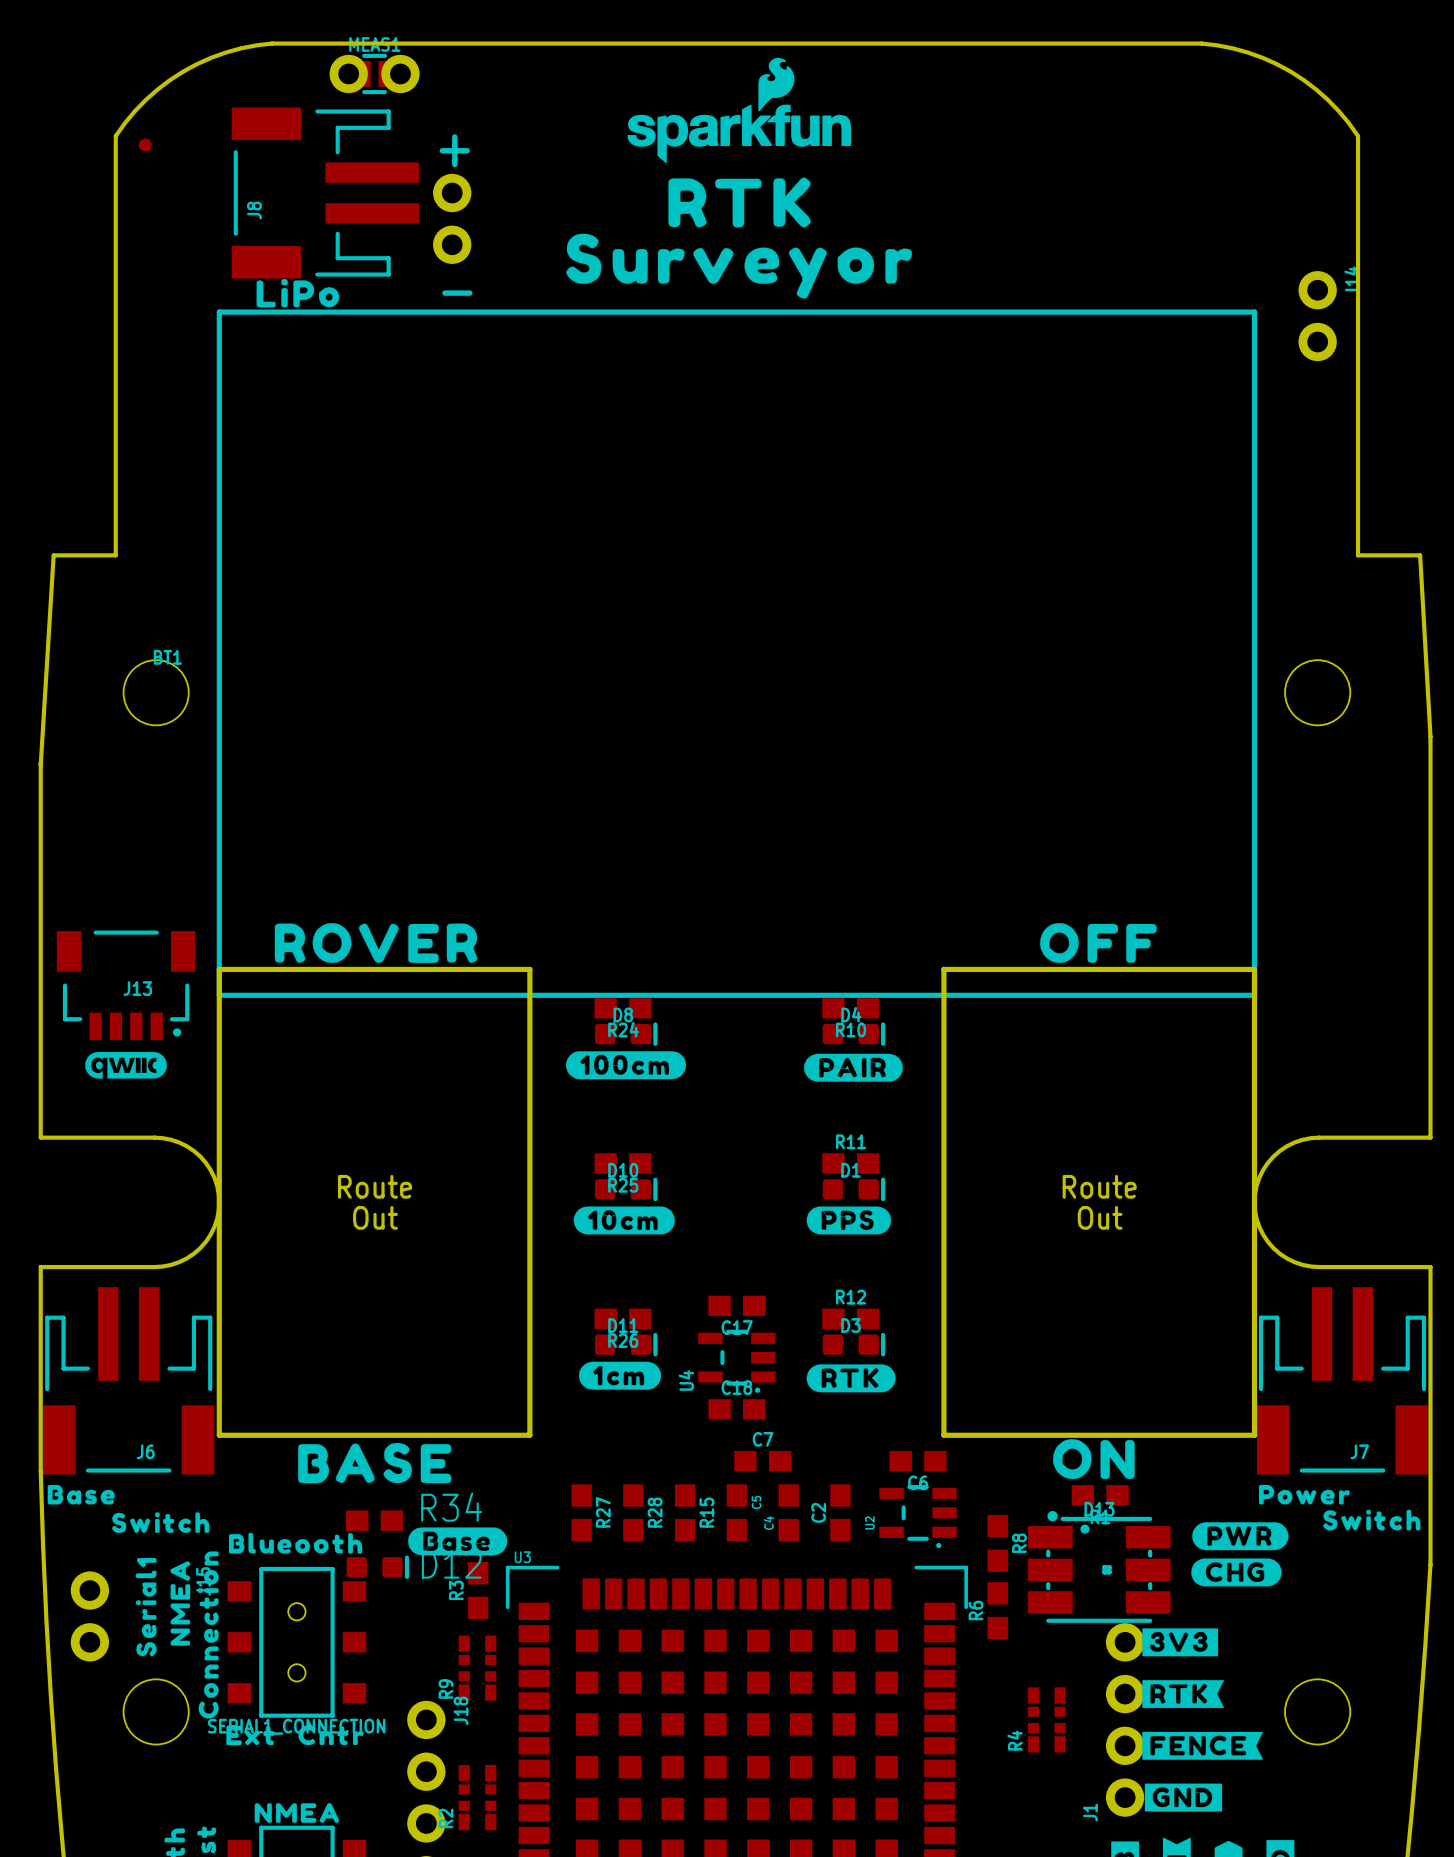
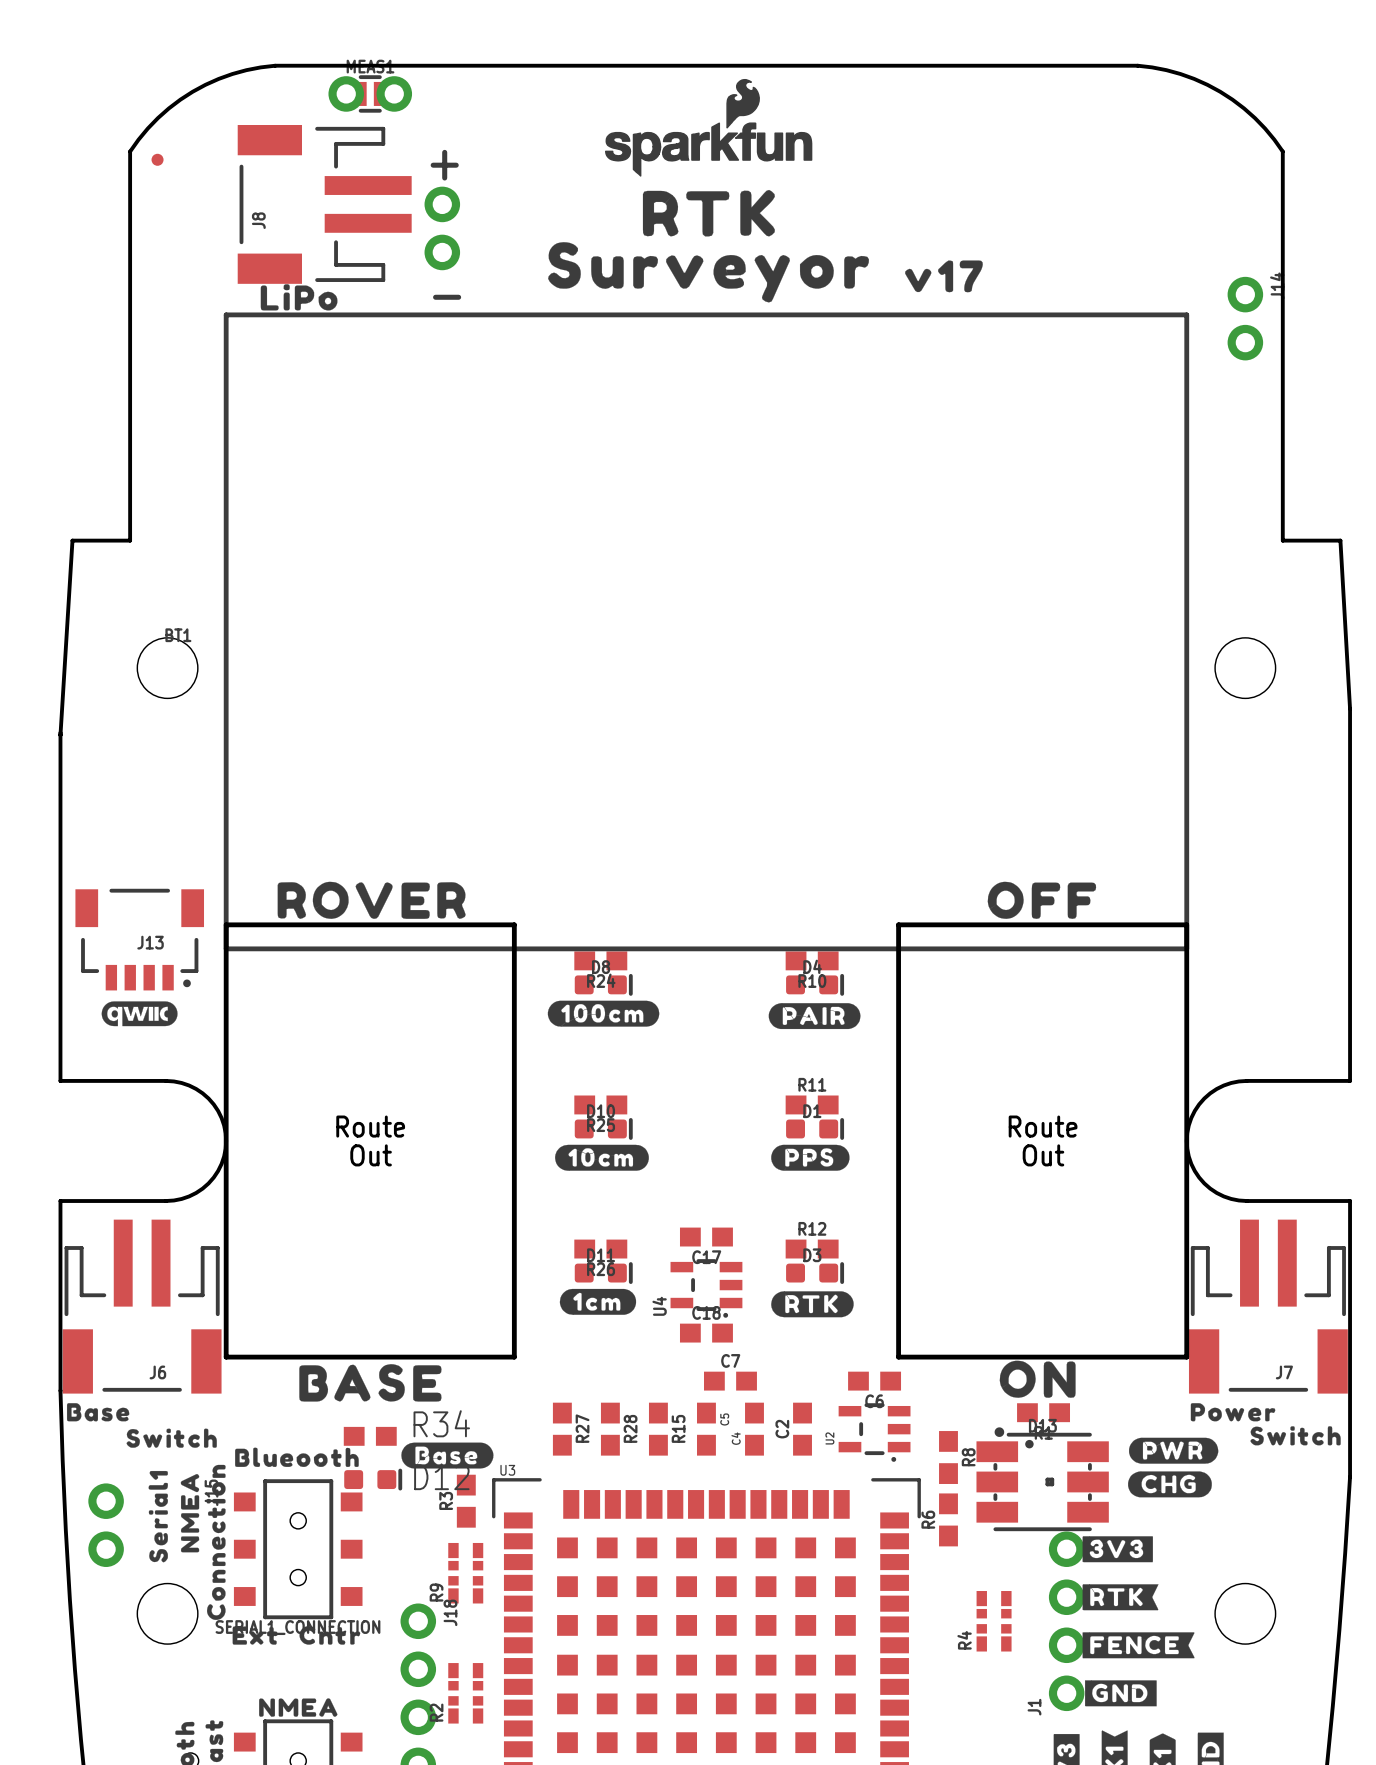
drawing: none -> [905, 260, 983, 293]

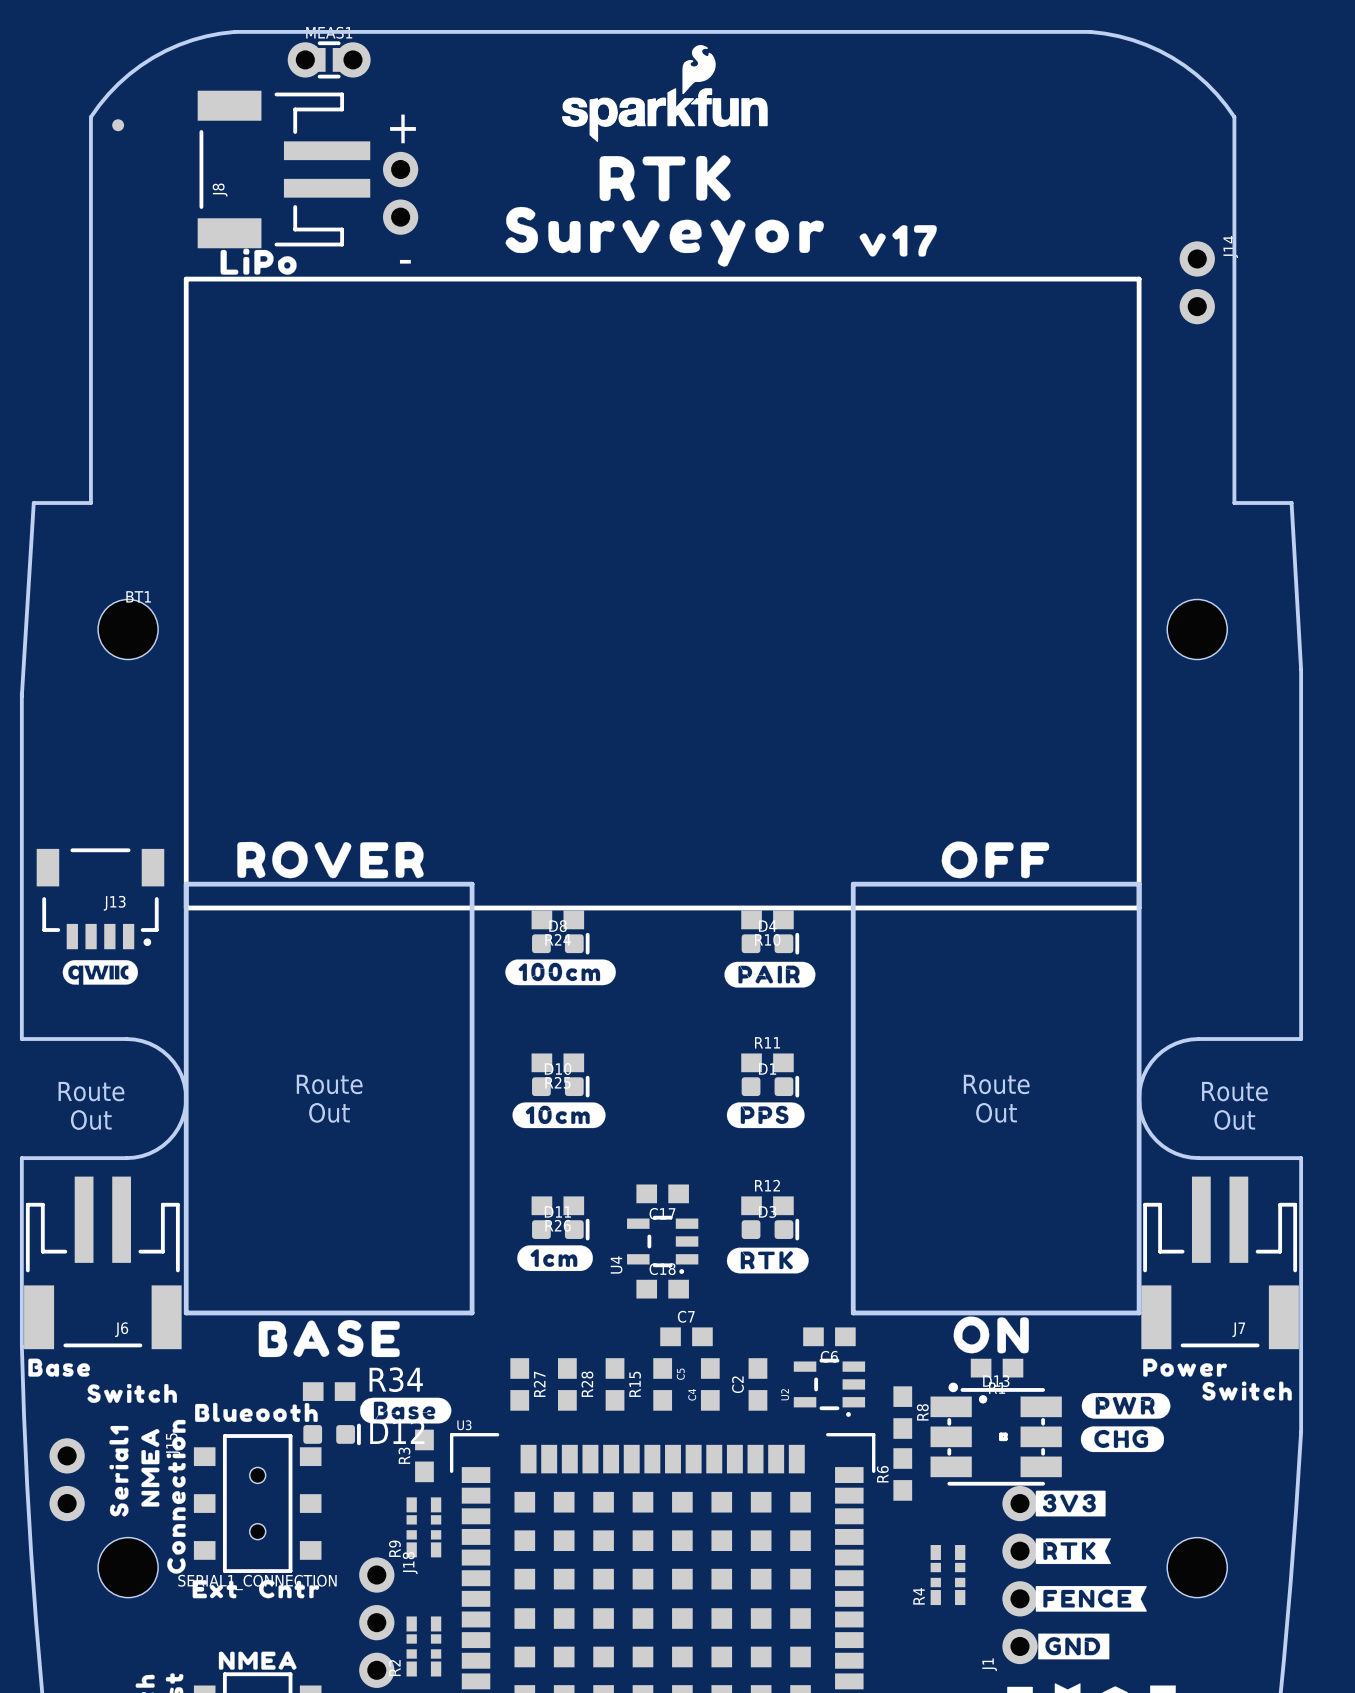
text: none -> Route (91, 1091)
text: none -> Route (1234, 1091)
text: none -> Out (91, 1120)
text: none -> Out (1234, 1120)

